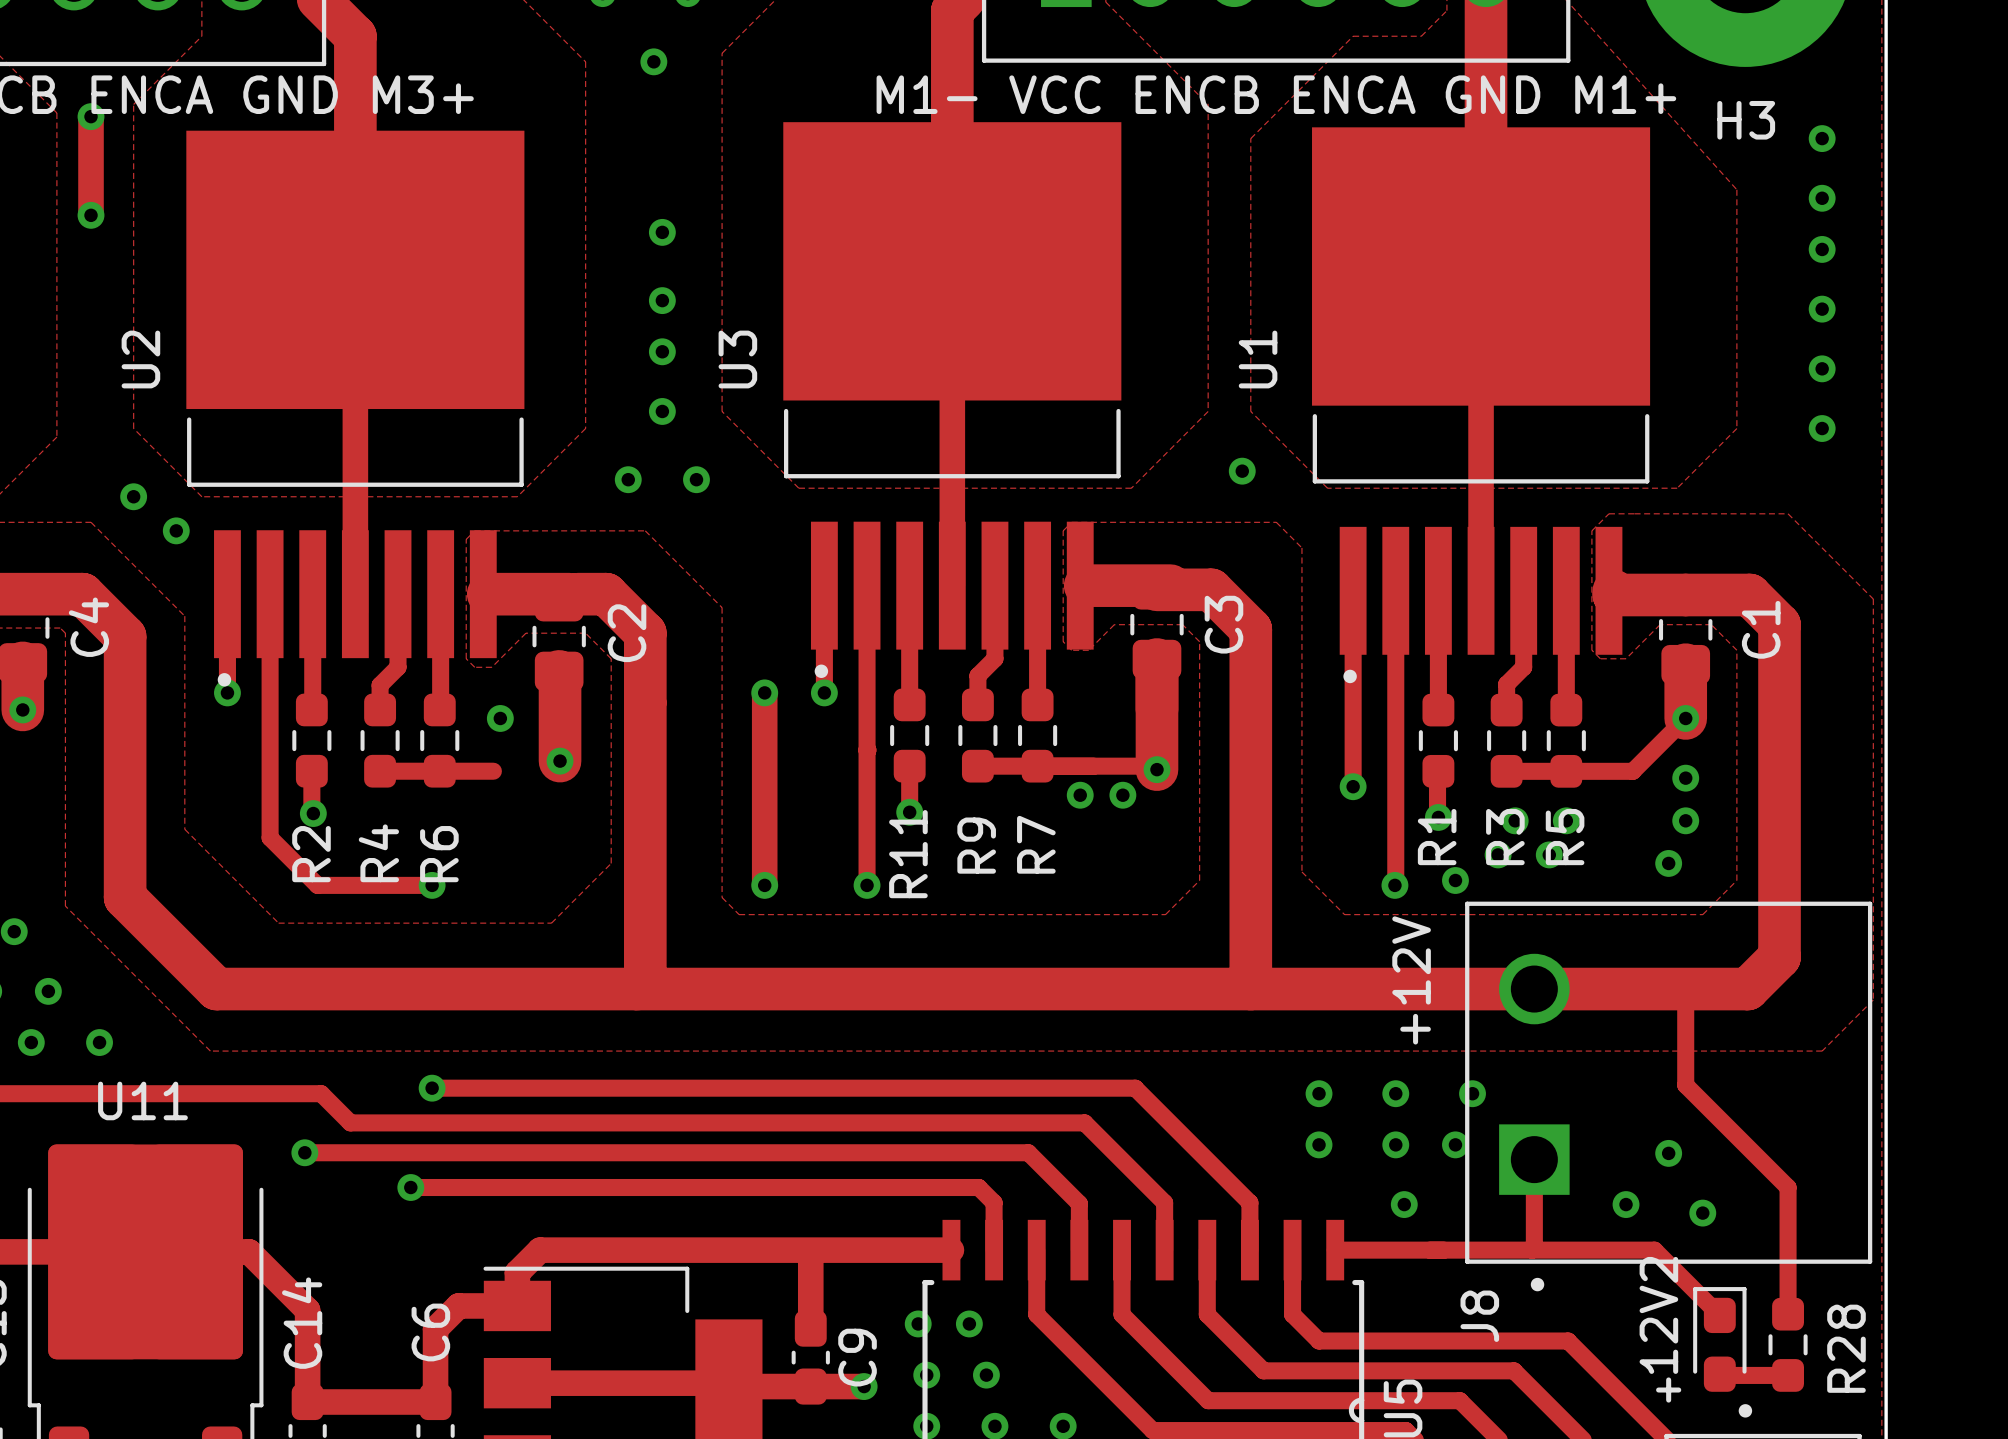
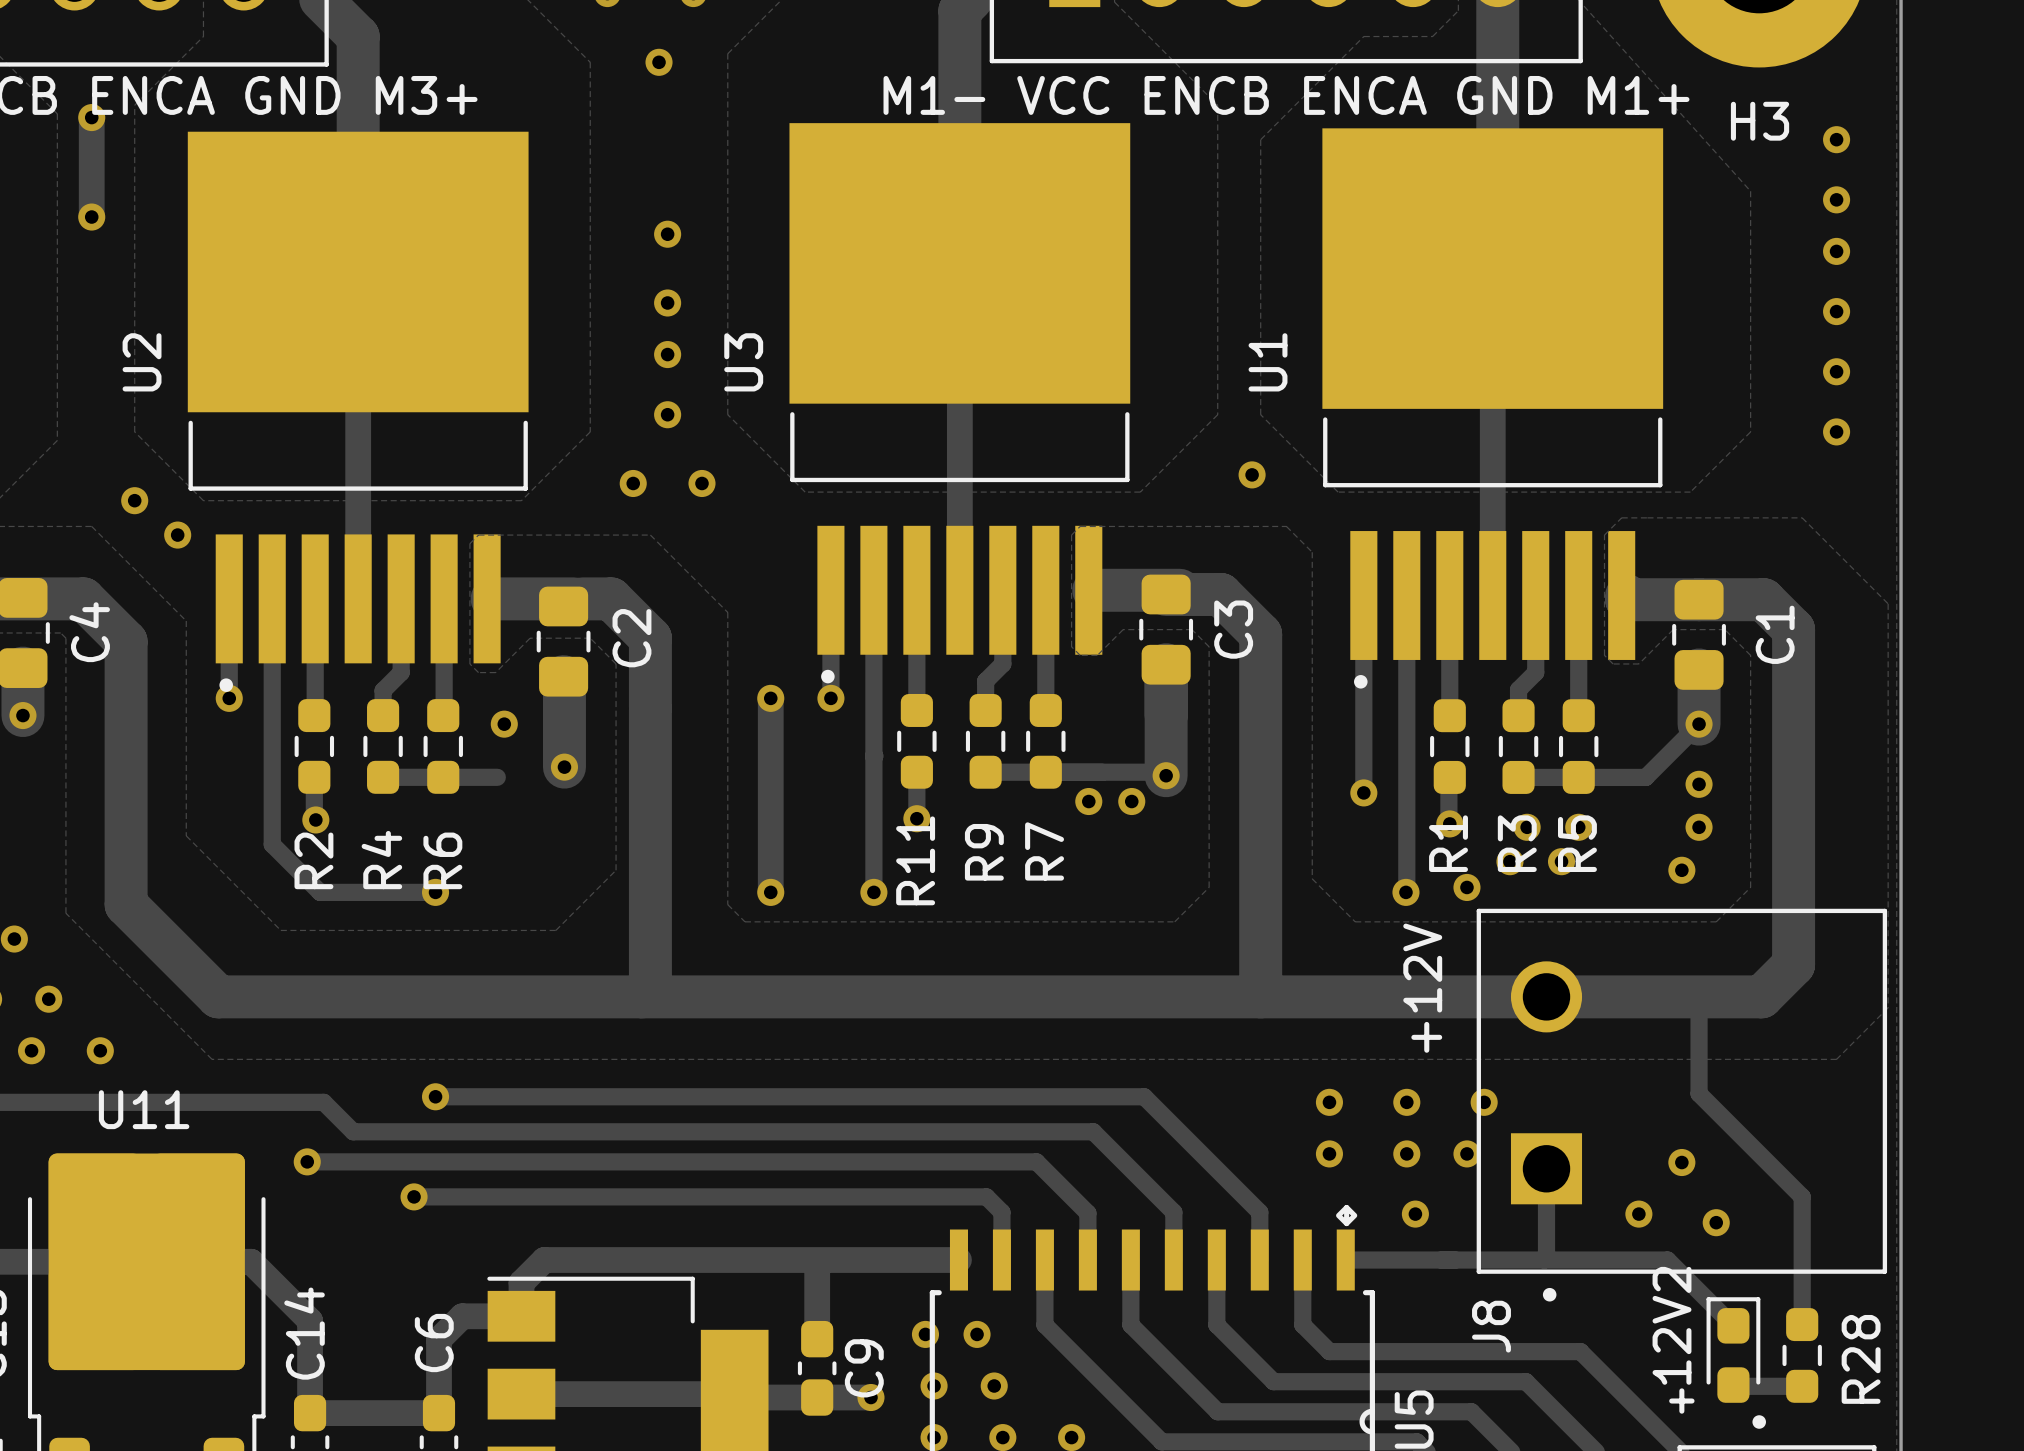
text: none -> . (1346, 1215)

